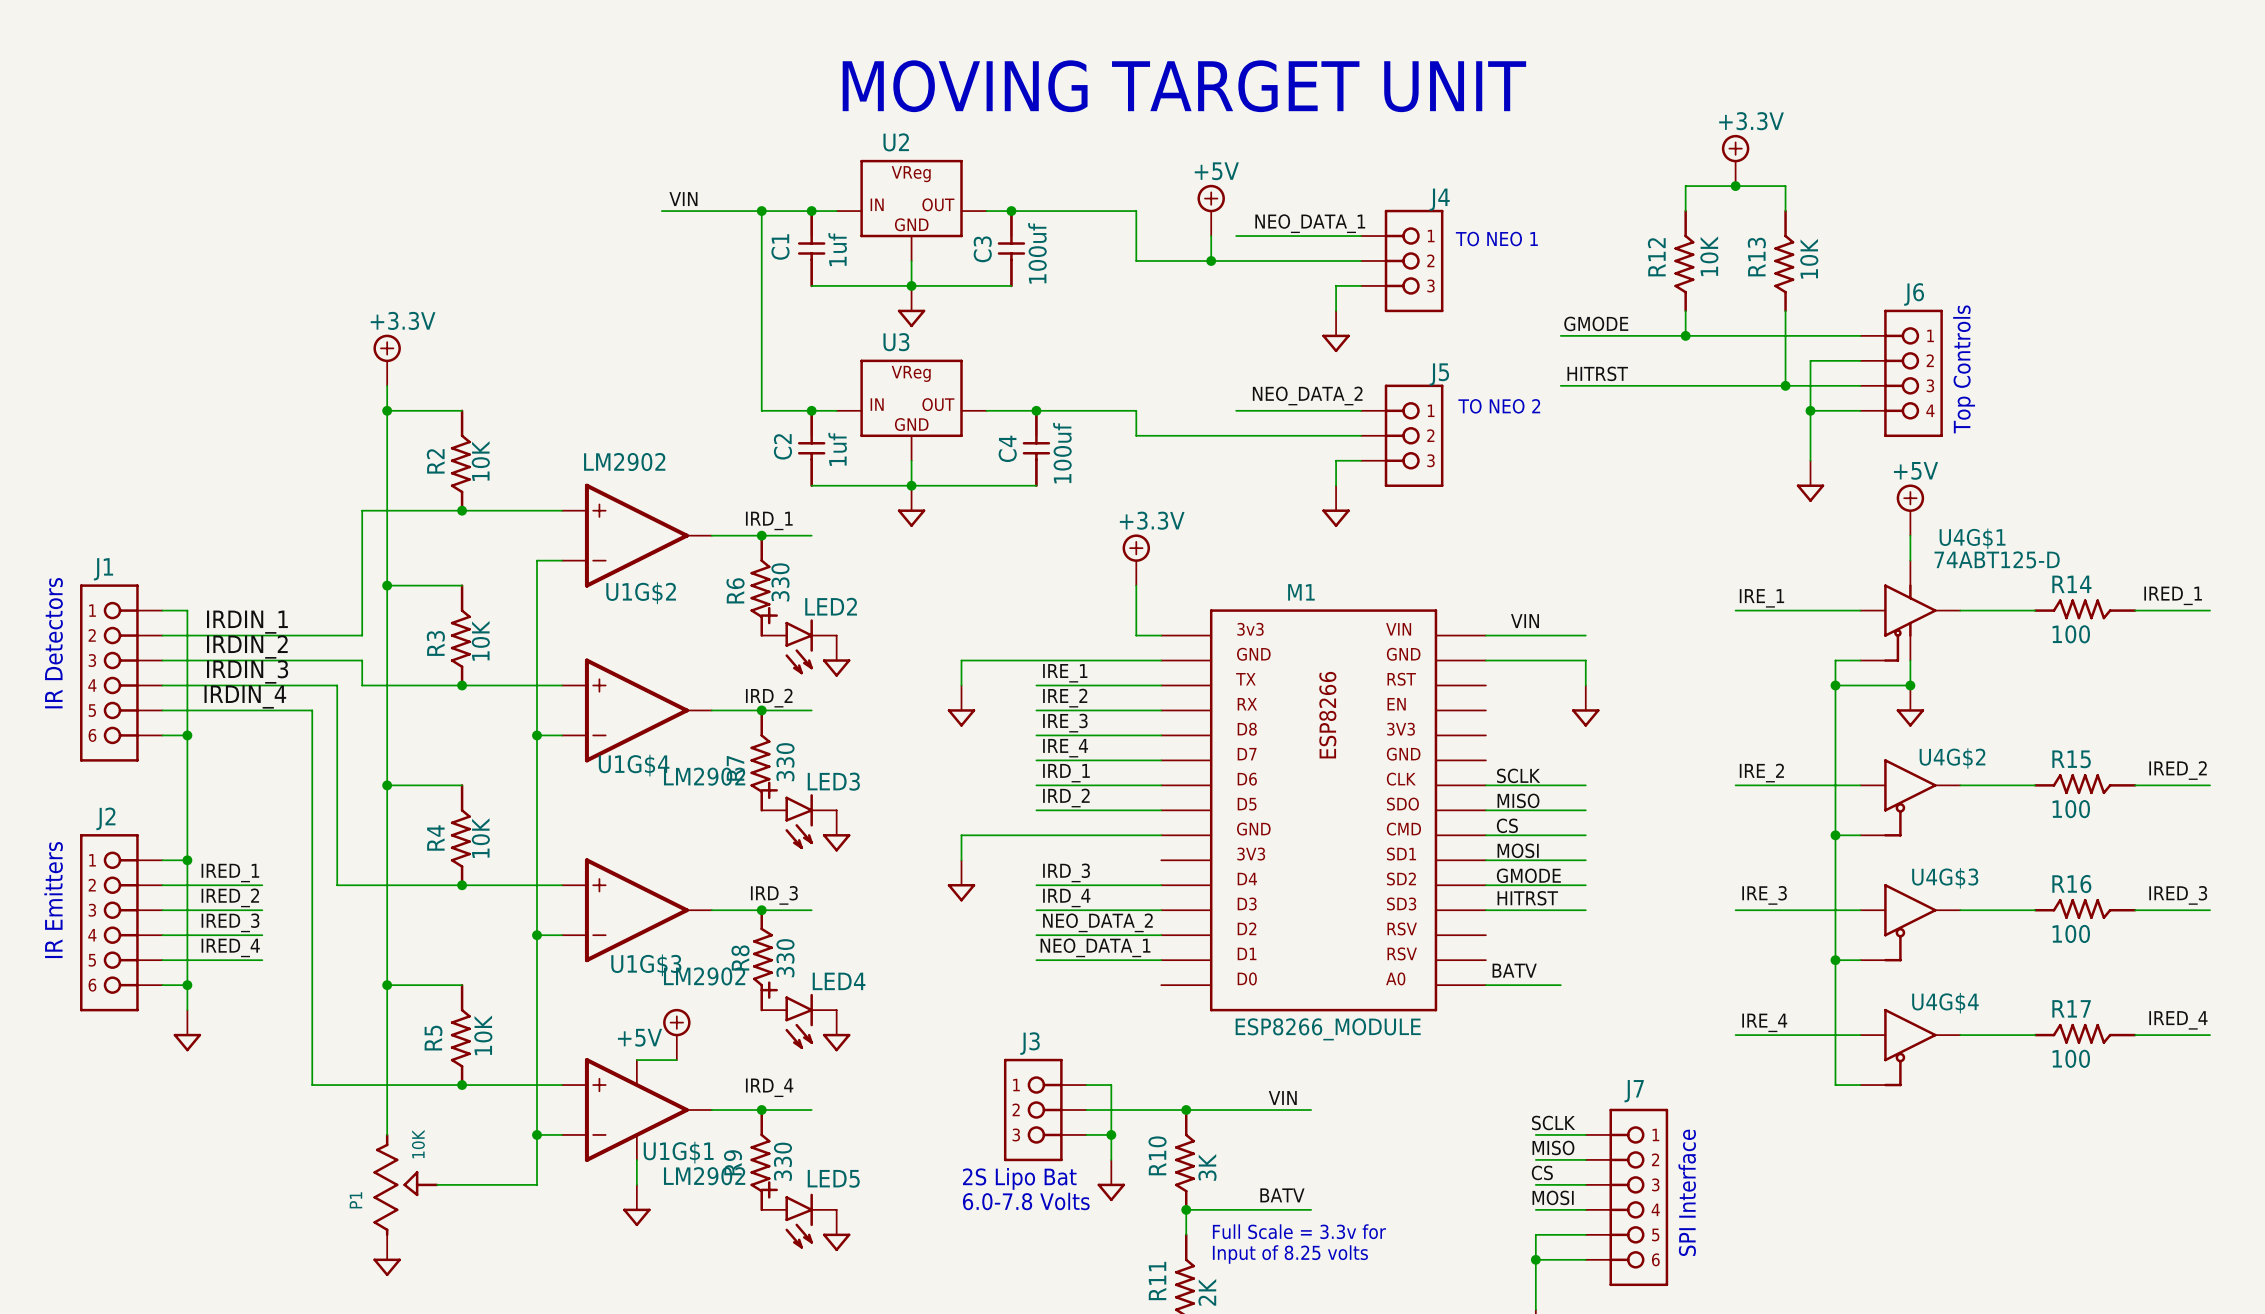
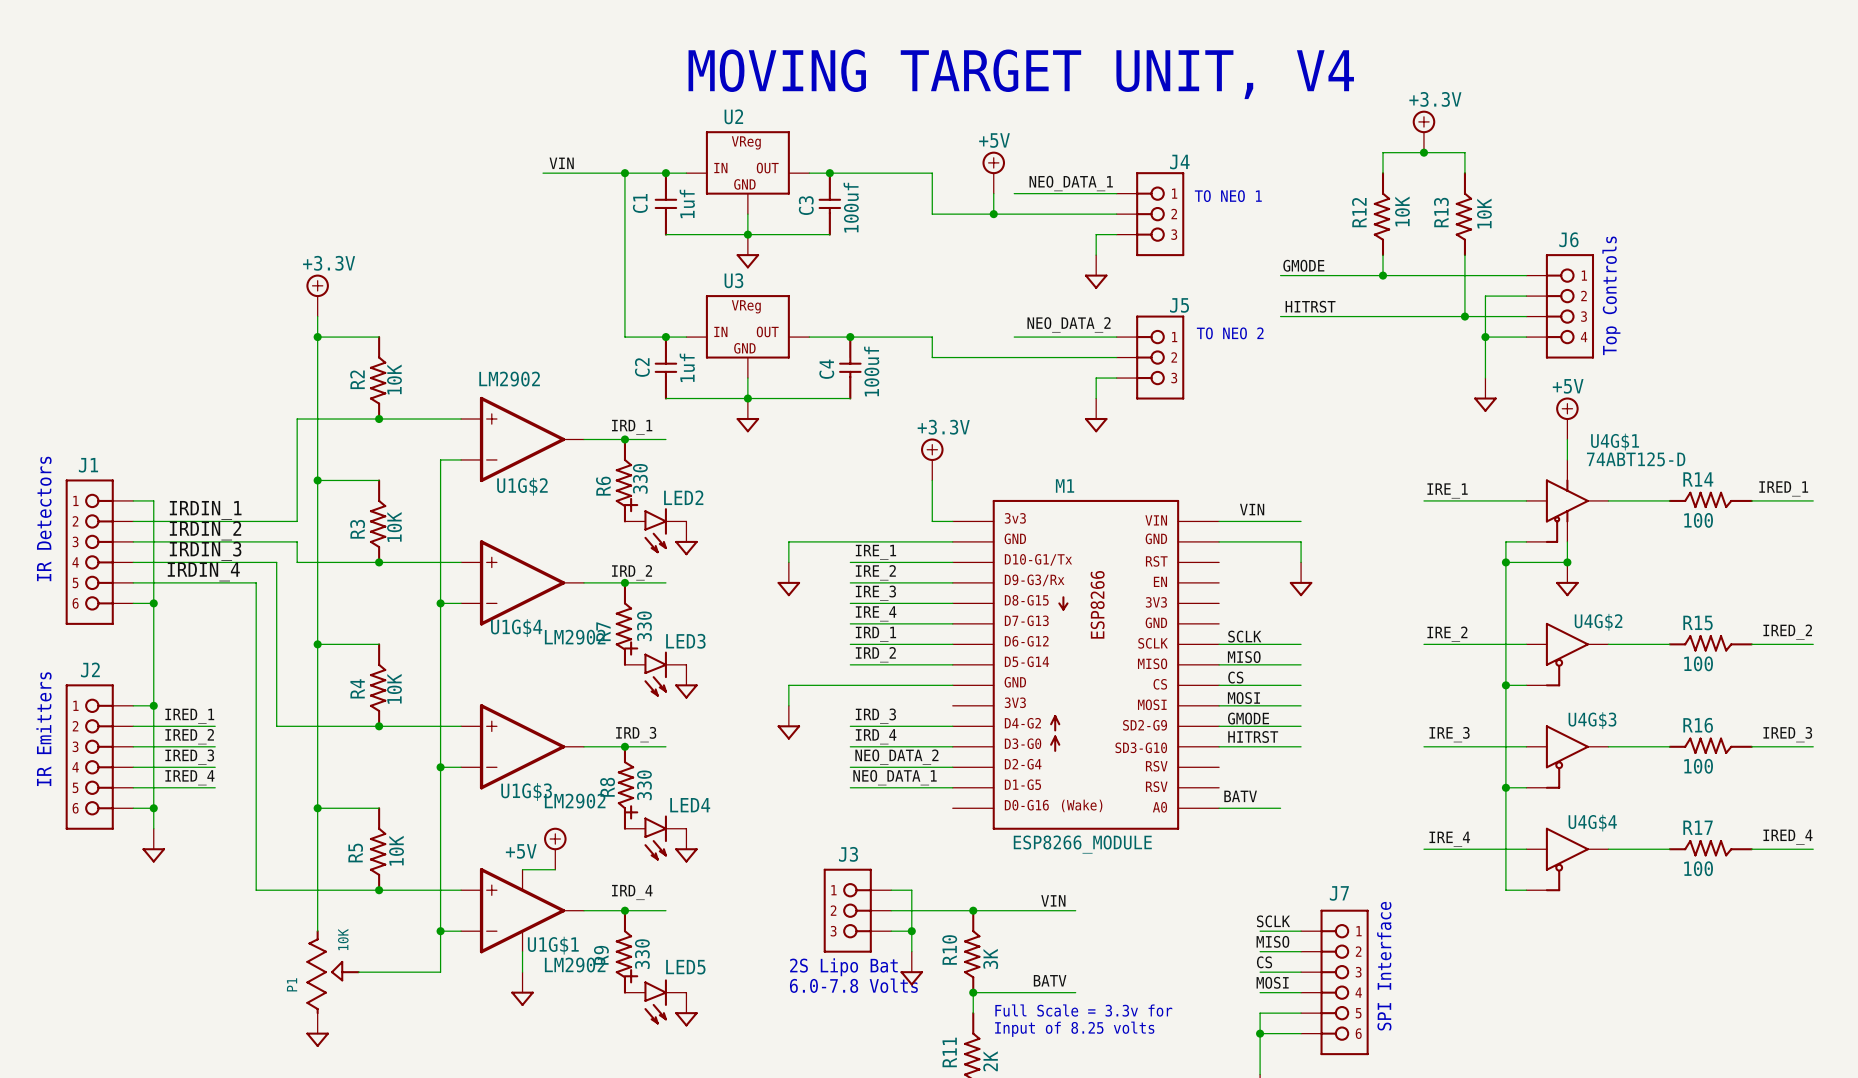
text: MOVING TARGET UNIT (1184, 86) -> MOVING TARGET UNIT, V4 (1021, 74)
M1 symbol: [1161, 609, 1486, 1012] -> [952, 499, 1220, 830]

